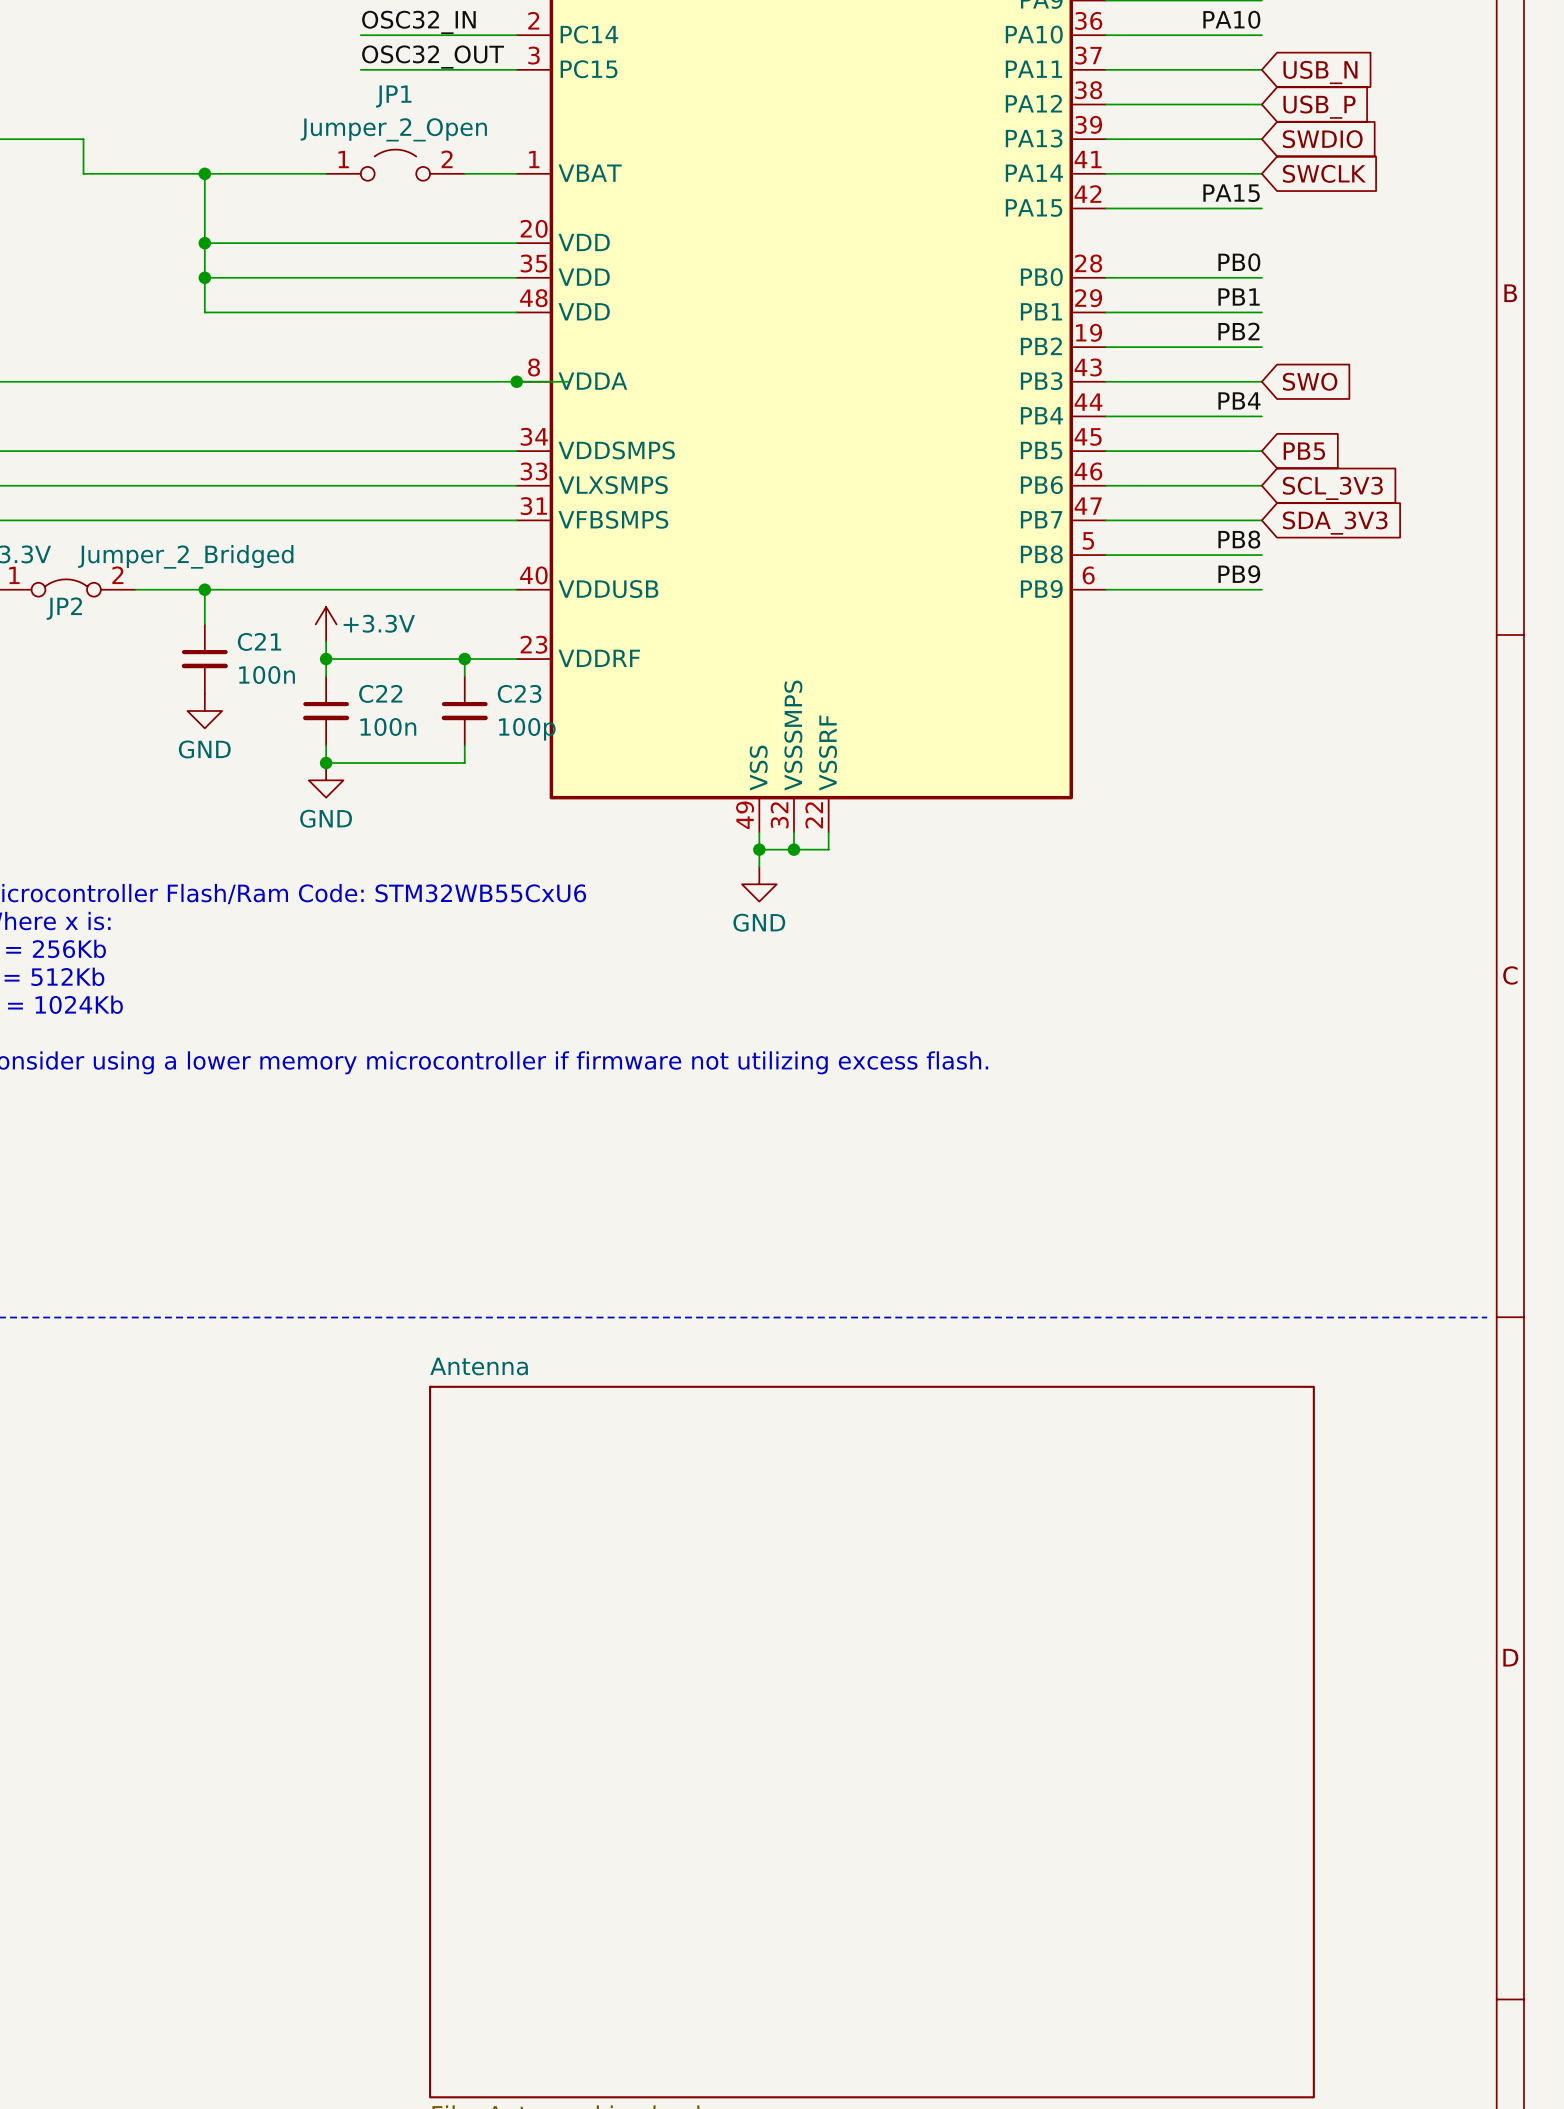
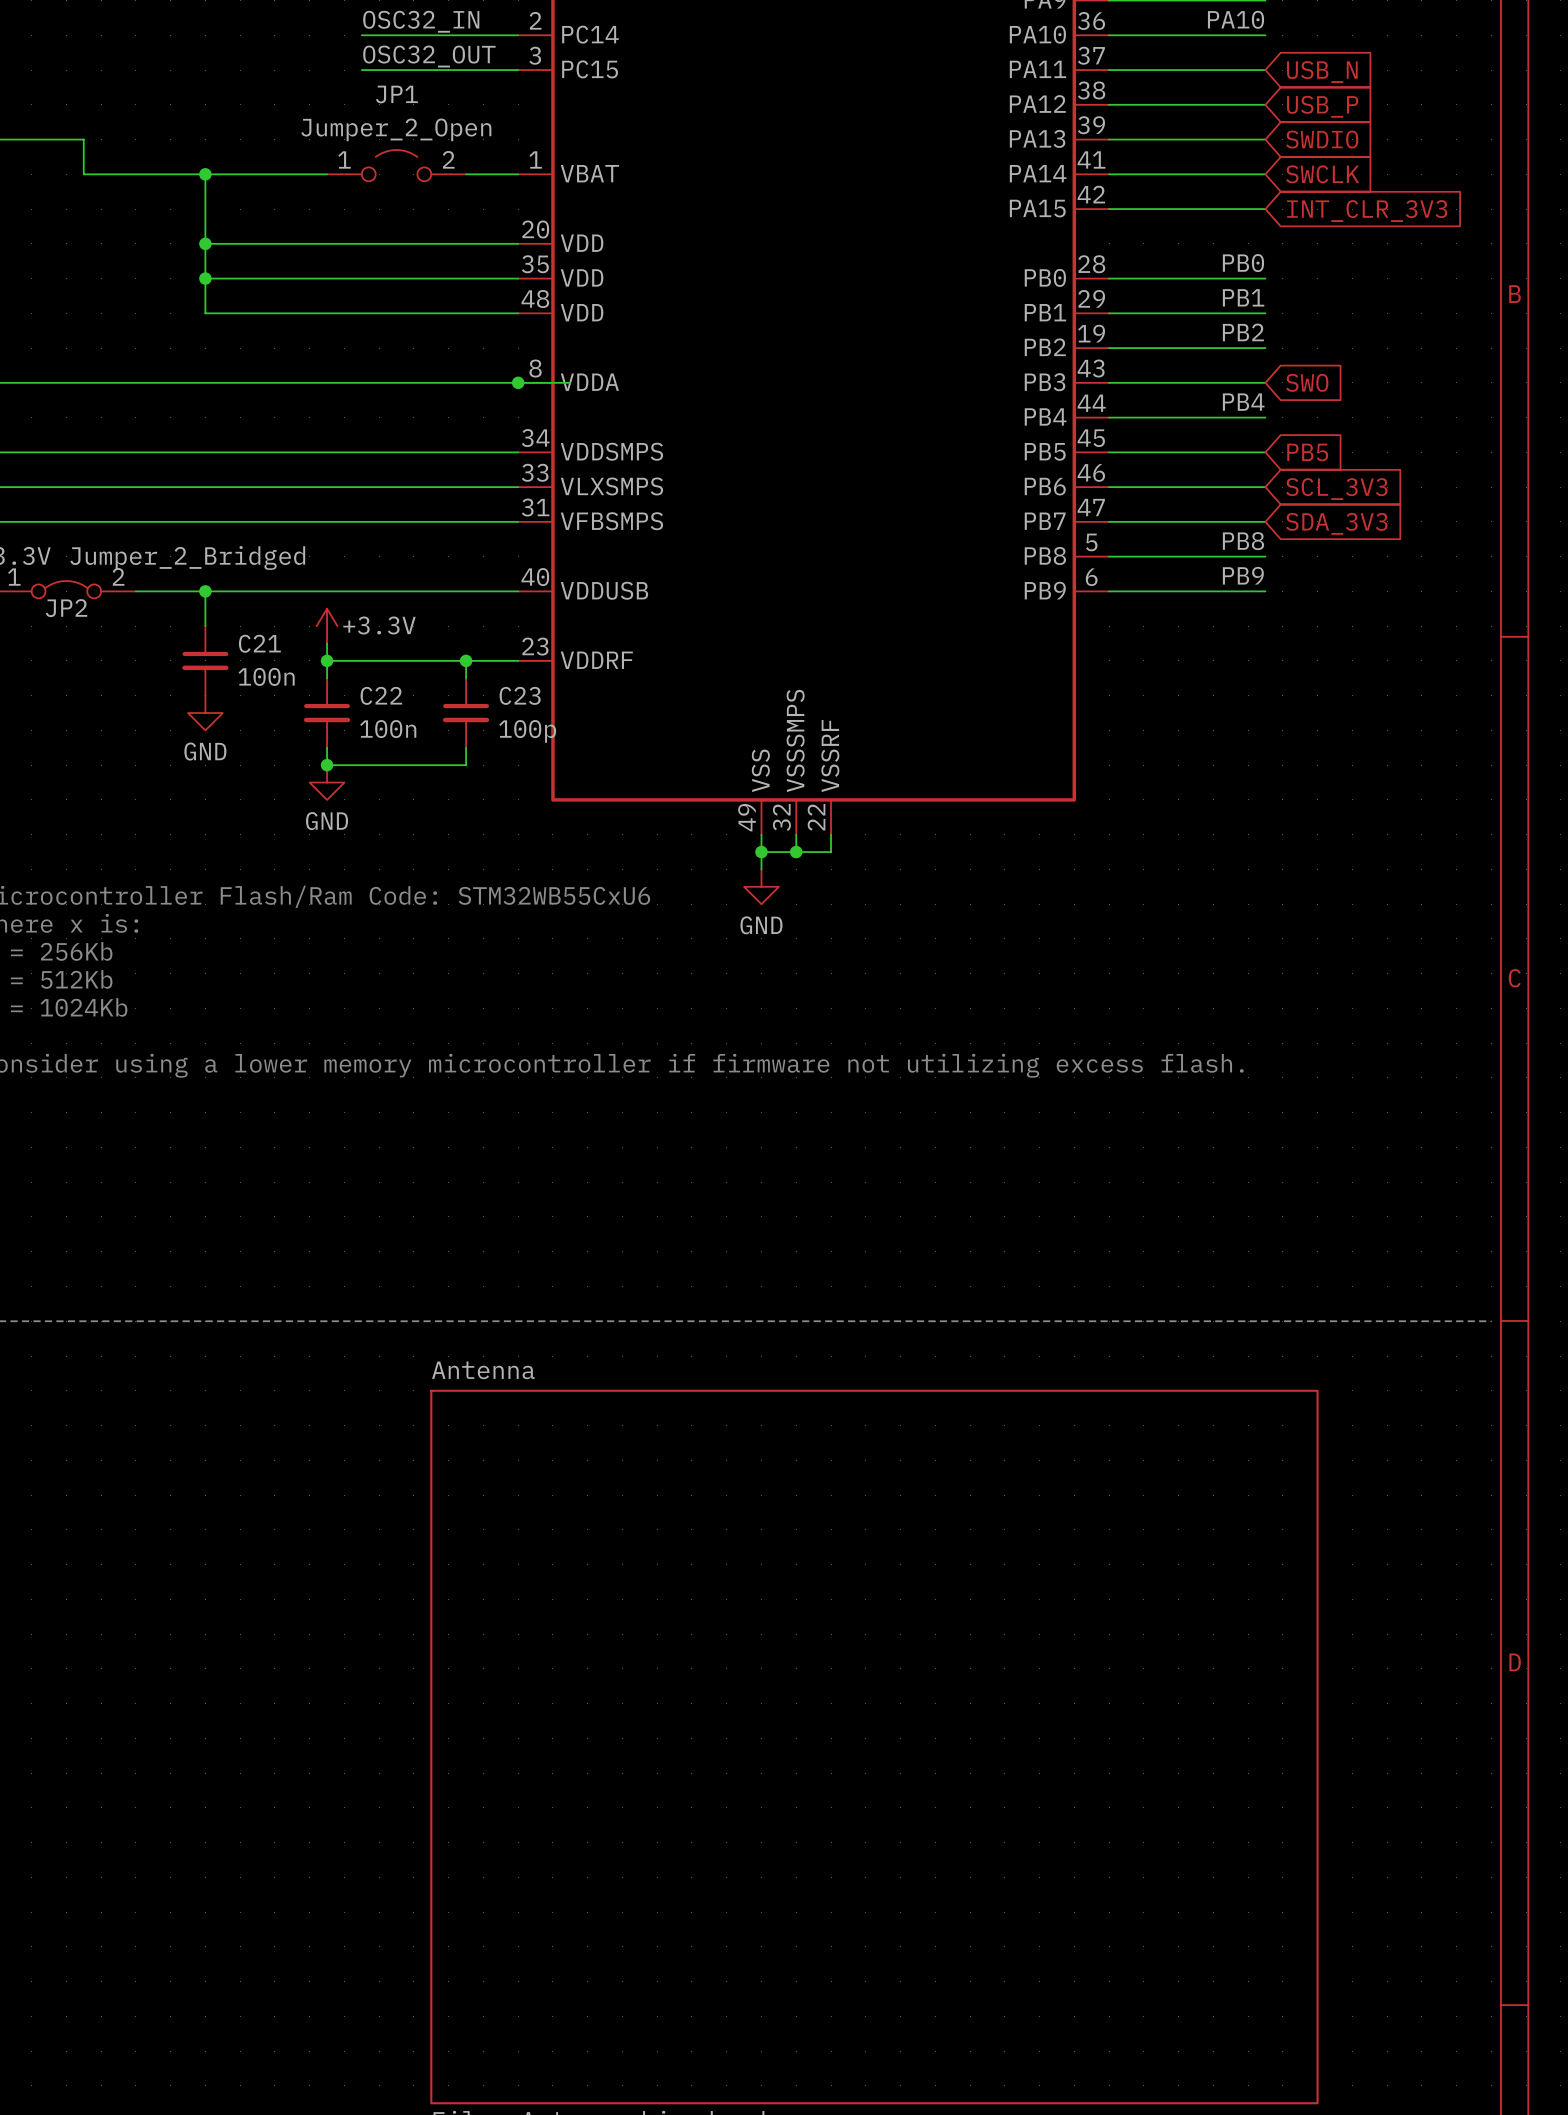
label: PA15 (1231, 193) -> none
global label: none -> INT_CLR_3V3 (1367, 211)

